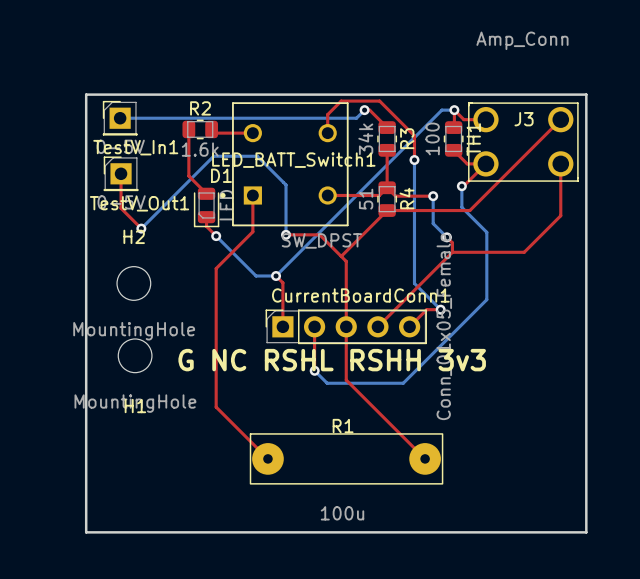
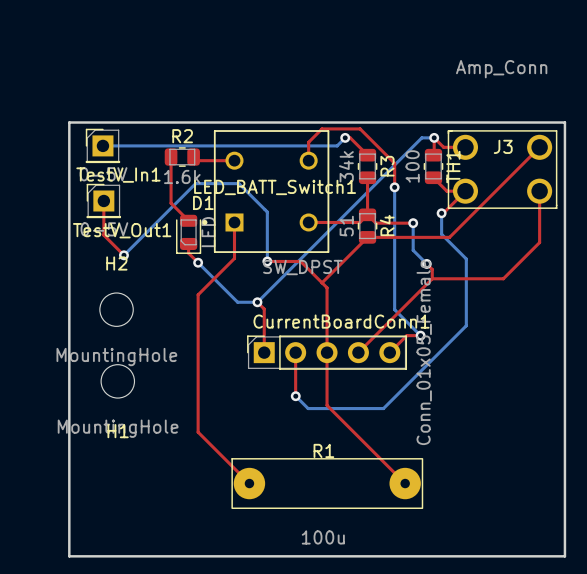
text: G NC RSHL RSHH 3v3 (332, 360) -> none

